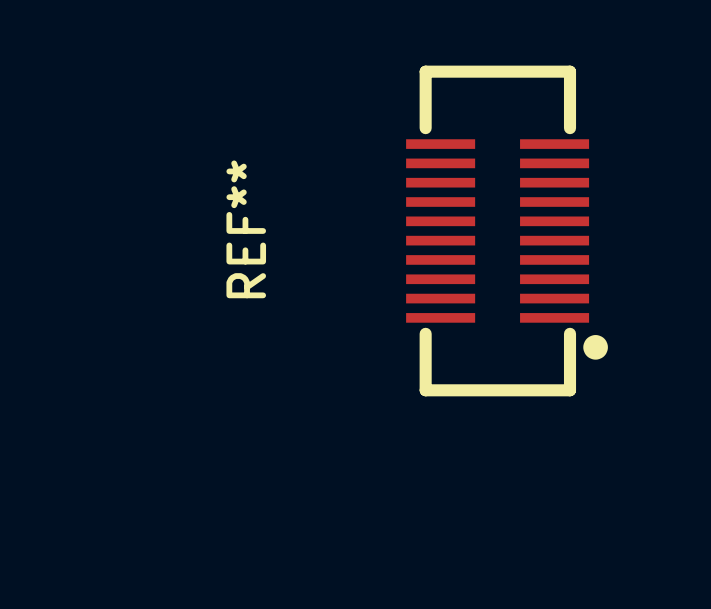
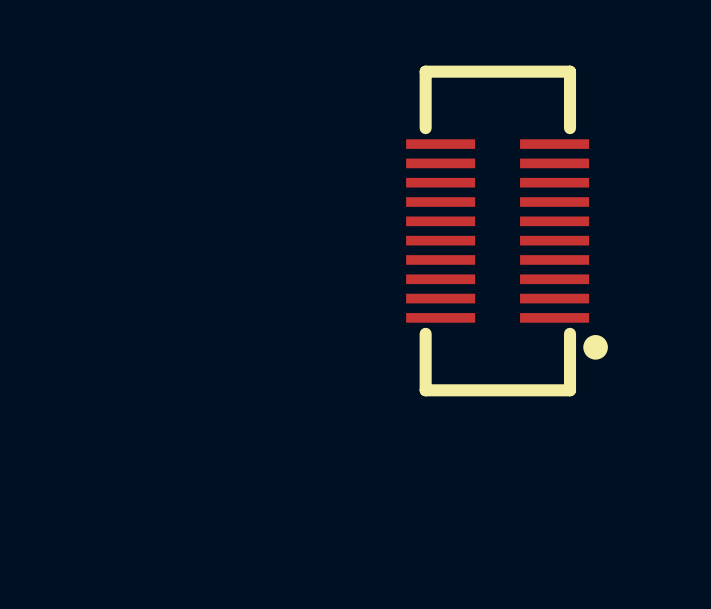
REF** name: REF** (246, 229) -> none

